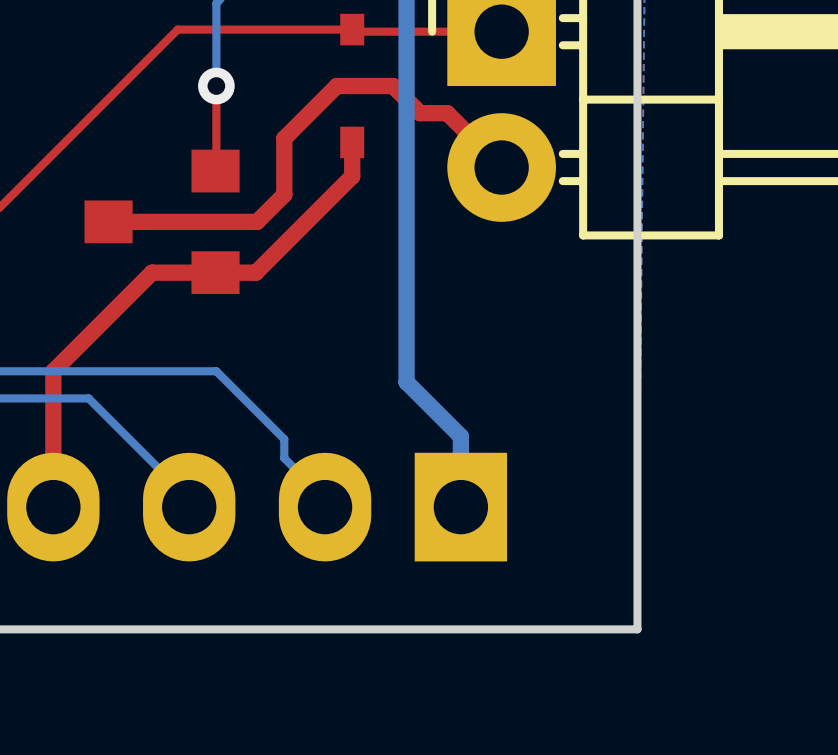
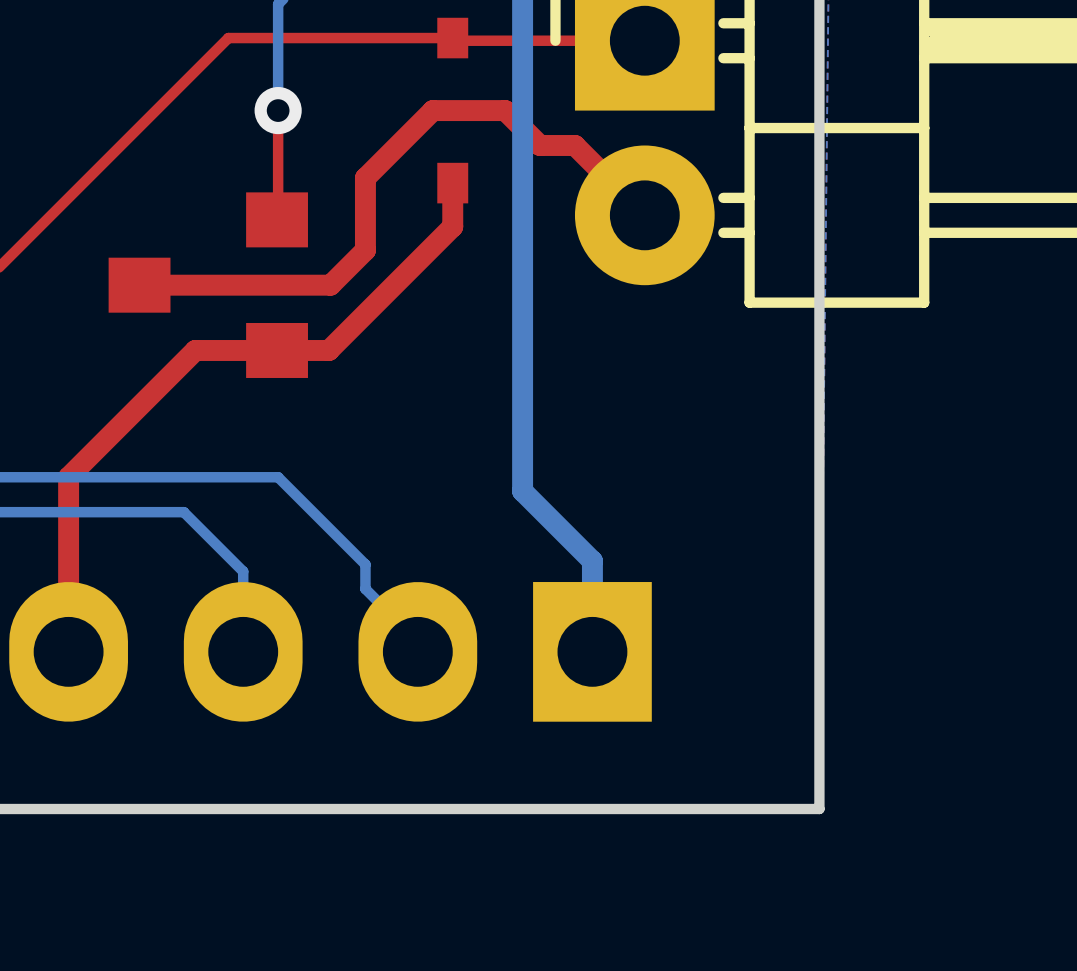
bottom track: (88, 398) (189, 498) -> (114, 512) (183, 512) (243, 571) (243, 641)

